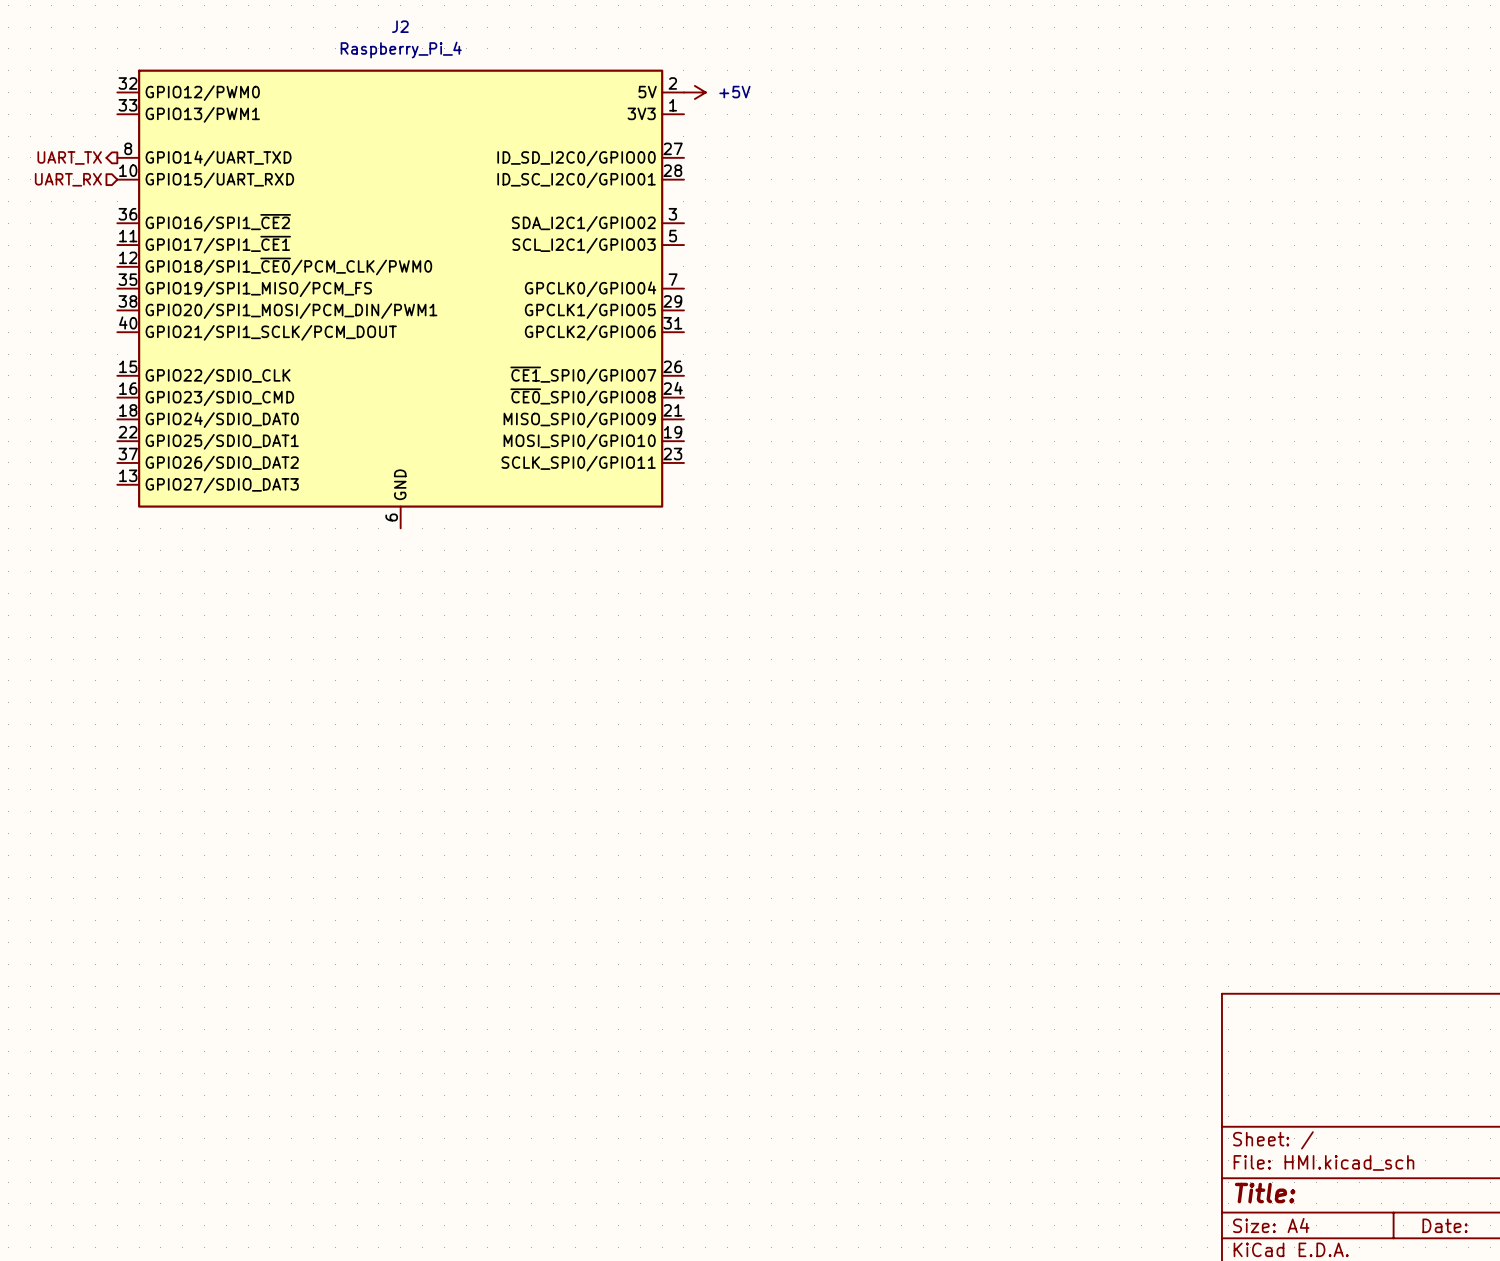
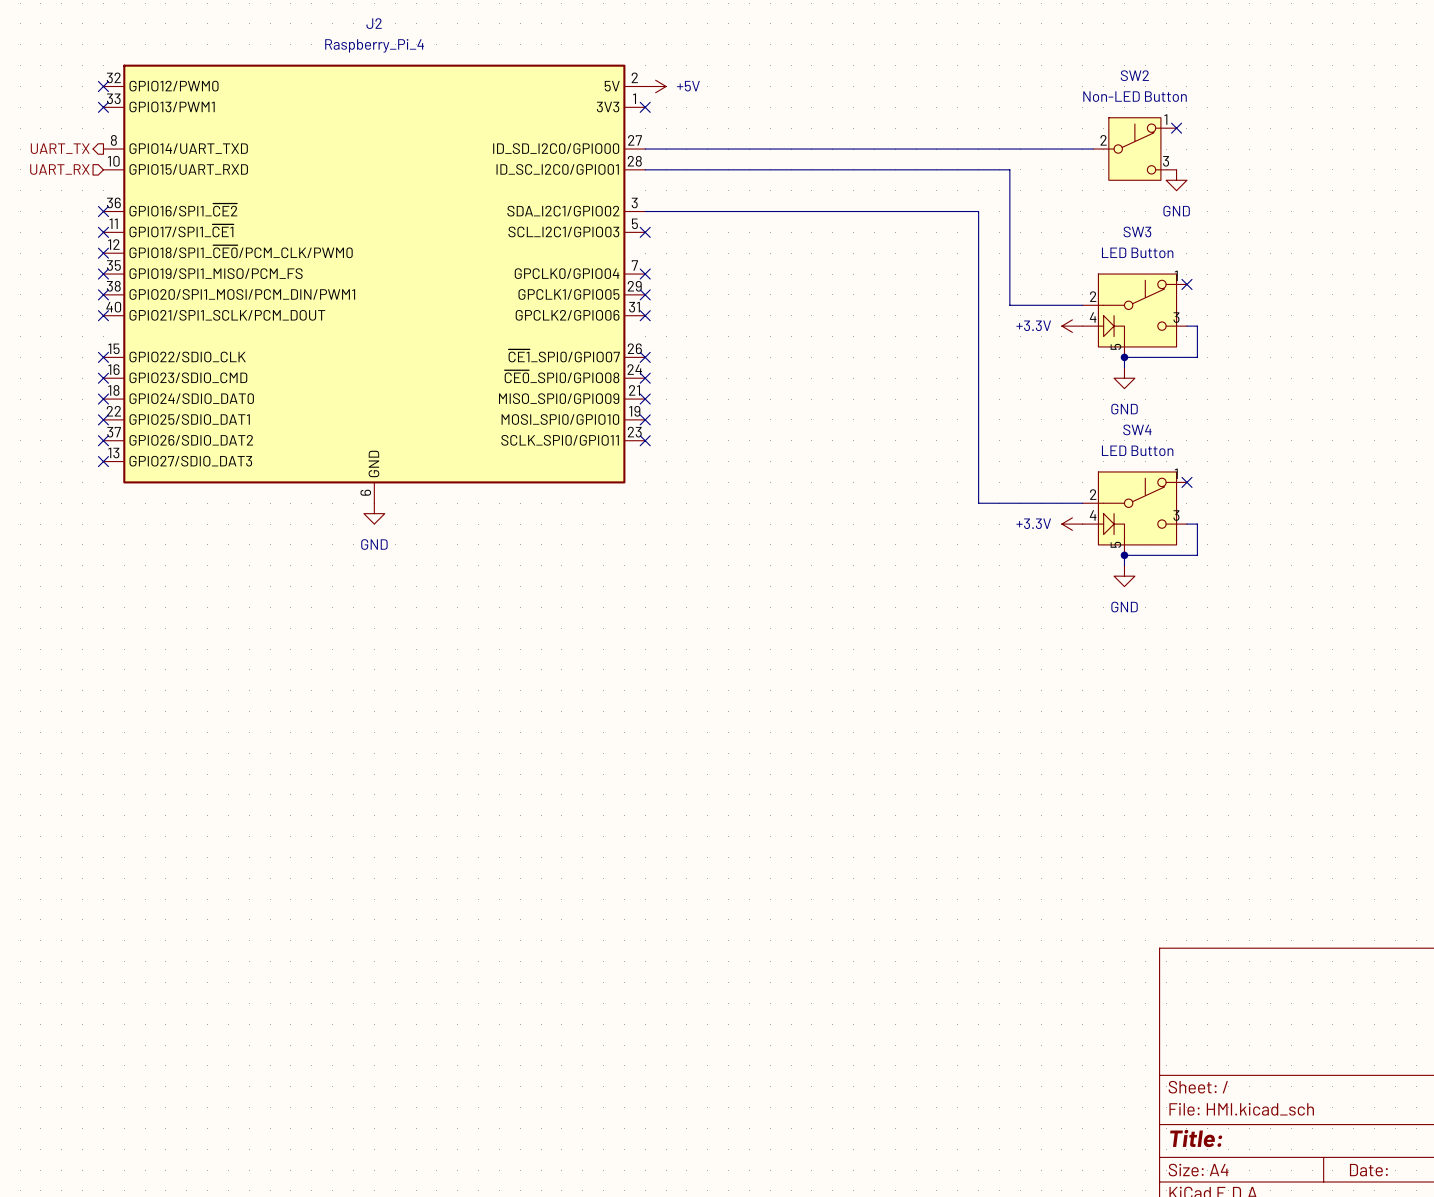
no-connect mark: none -> (103, 86)
no-connect mark: none -> (103, 107)
no-connect mark: none -> (645, 107)
no-connect mark: none -> (1176, 128)
wire: none -> (645, 149) (1093, 149)
SW2: none -> Non-LED Button (1134, 149)
wire: none -> (645, 169) (1009, 169) (1009, 305) (1082, 305)
power symbol: none -> GND (1176, 180)
no-connect mark: none -> (103, 211)
wire: none -> (645, 211) (978, 211) (978, 503) (1082, 503)
no-connect mark: none -> (103, 232)
no-connect mark: none -> (645, 232)
no-connect mark: none -> (103, 253)
no-connect mark: none -> (103, 274)
no-connect mark: none -> (645, 274)
no-connect mark: none -> (1186, 284)
no-connect mark: none -> (103, 294)
no-connect mark: none -> (645, 294)
no-connect mark: none -> (103, 315)
no-connect mark: none -> (645, 315)
SW3: none -> LED Button (1134, 315)
power symbol: none -> +3.3V (1072, 326)
wire: none -> (1186, 326) (1197, 326) (1197, 357) (1124, 357) (1124, 367)
no-connect mark: none -> (103, 357)
no-connect mark: none -> (645, 357)
junction: none -> (1124, 357)
no-connect mark: none -> (103, 378)
no-connect mark: none -> (645, 378)
power symbol: none -> GND (1124, 378)
no-connect mark: none -> (103, 399)
no-connect mark: none -> (645, 399)
no-connect mark: none -> (103, 419)
no-connect mark: none -> (645, 419)
no-connect mark: none -> (103, 440)
no-connect mark: none -> (645, 440)
no-connect mark: none -> (103, 461)
no-connect mark: none -> (1186, 482)
power symbol: none -> GND (374, 513)
SW4: none -> LED Button (1134, 513)
power symbol: none -> +3.3V (1072, 524)
wire: none -> (1186, 524) (1197, 524) (1197, 555) (1124, 555) (1124, 565)
junction: none -> (1124, 555)
power symbol: none -> GND (1124, 576)

